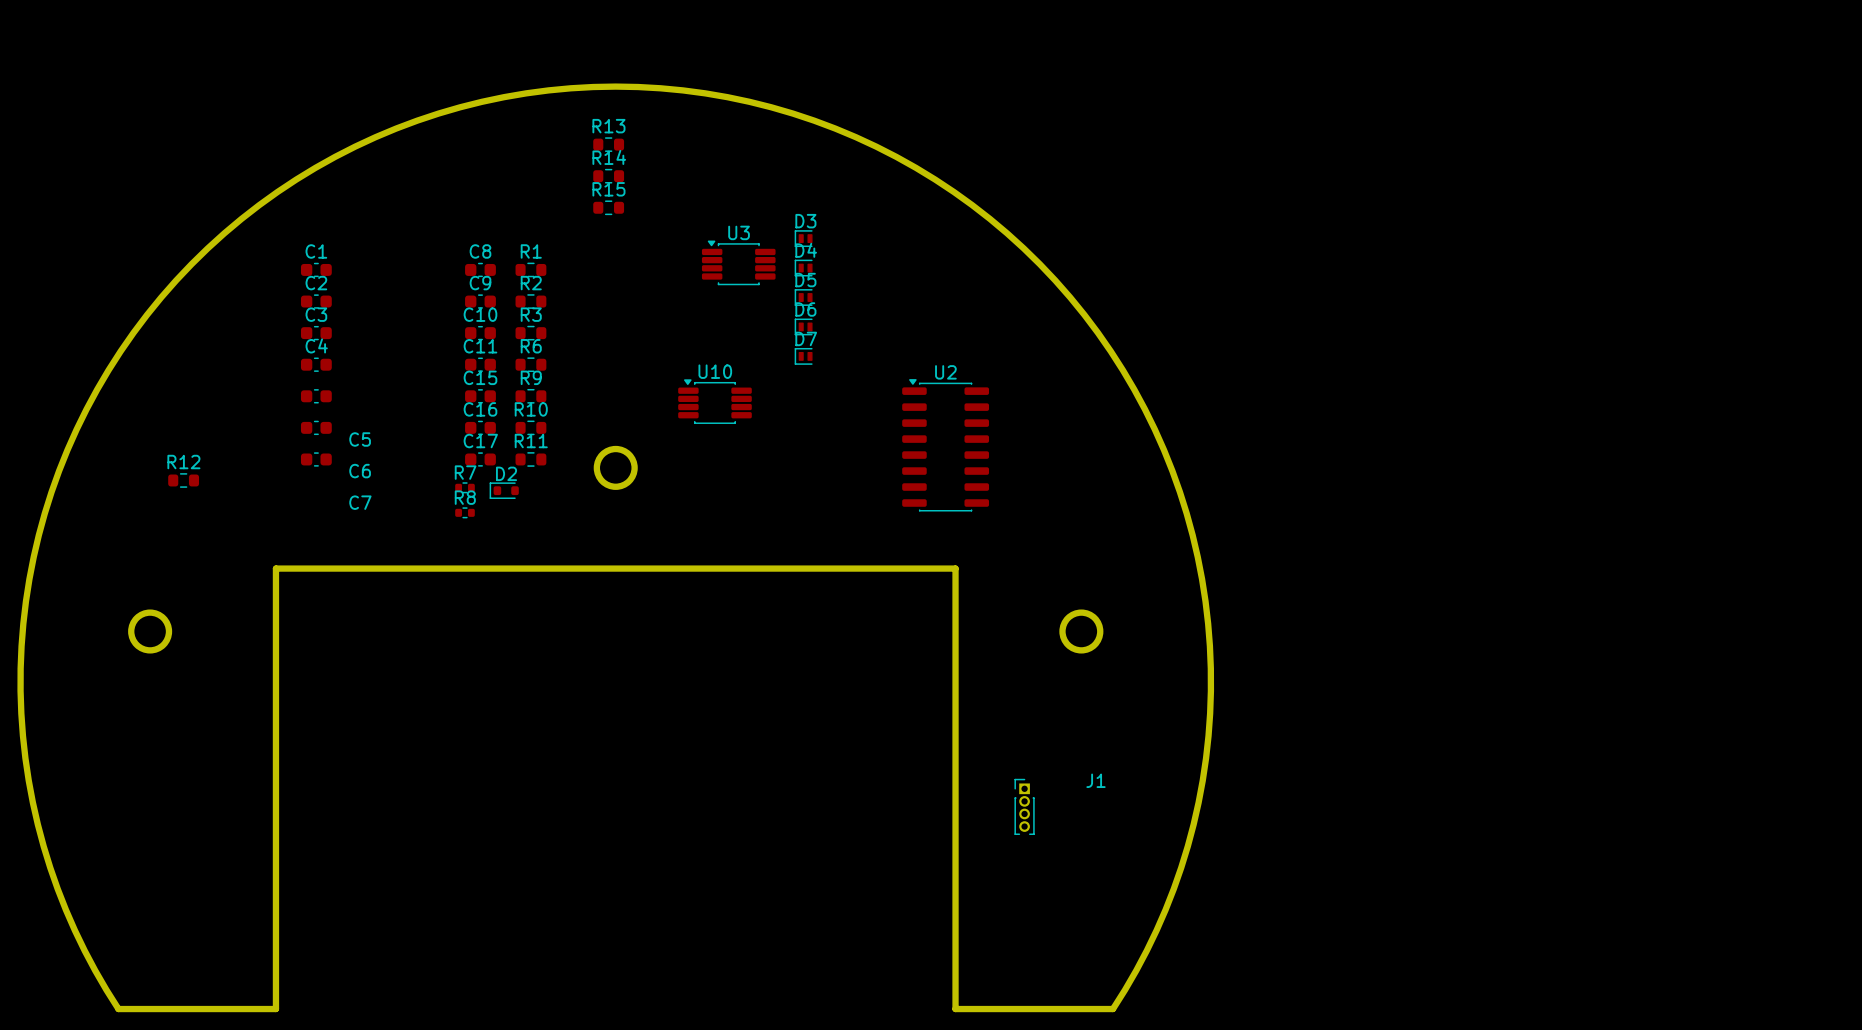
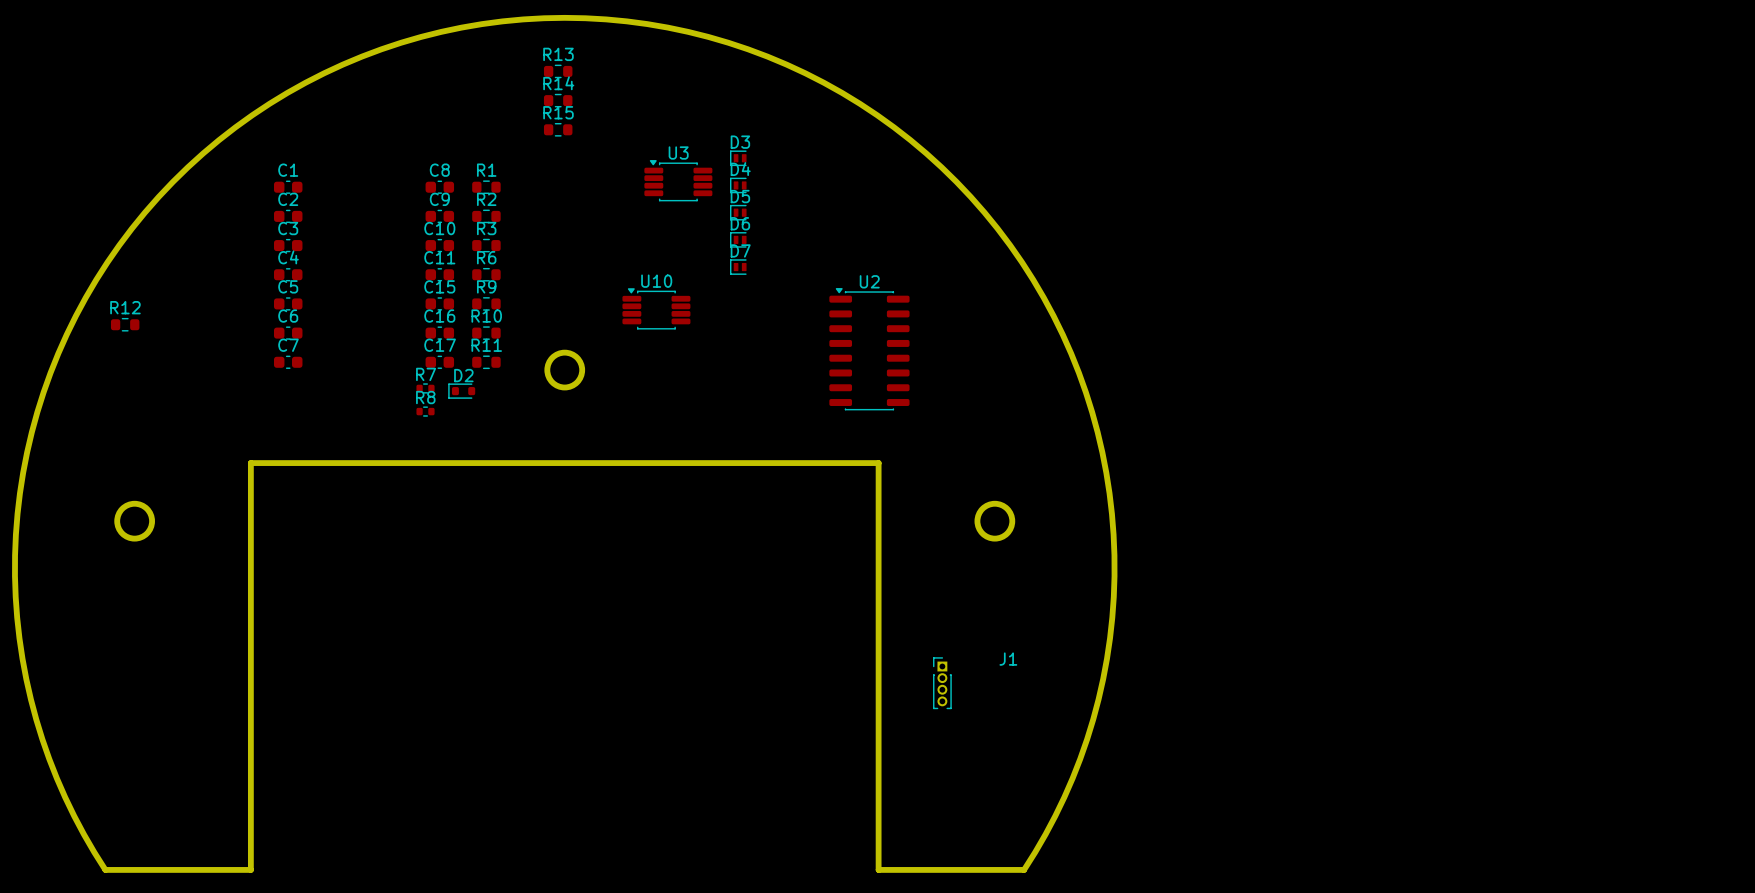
C5 name position: C5 (360, 439) -> C5 (288, 286)
C6 name position: C6 (360, 471) -> C6 (288, 316)
R12 position: (183, 480) -> (125, 324)
C7 name position: C7 (360, 502) -> C7 (288, 345)

